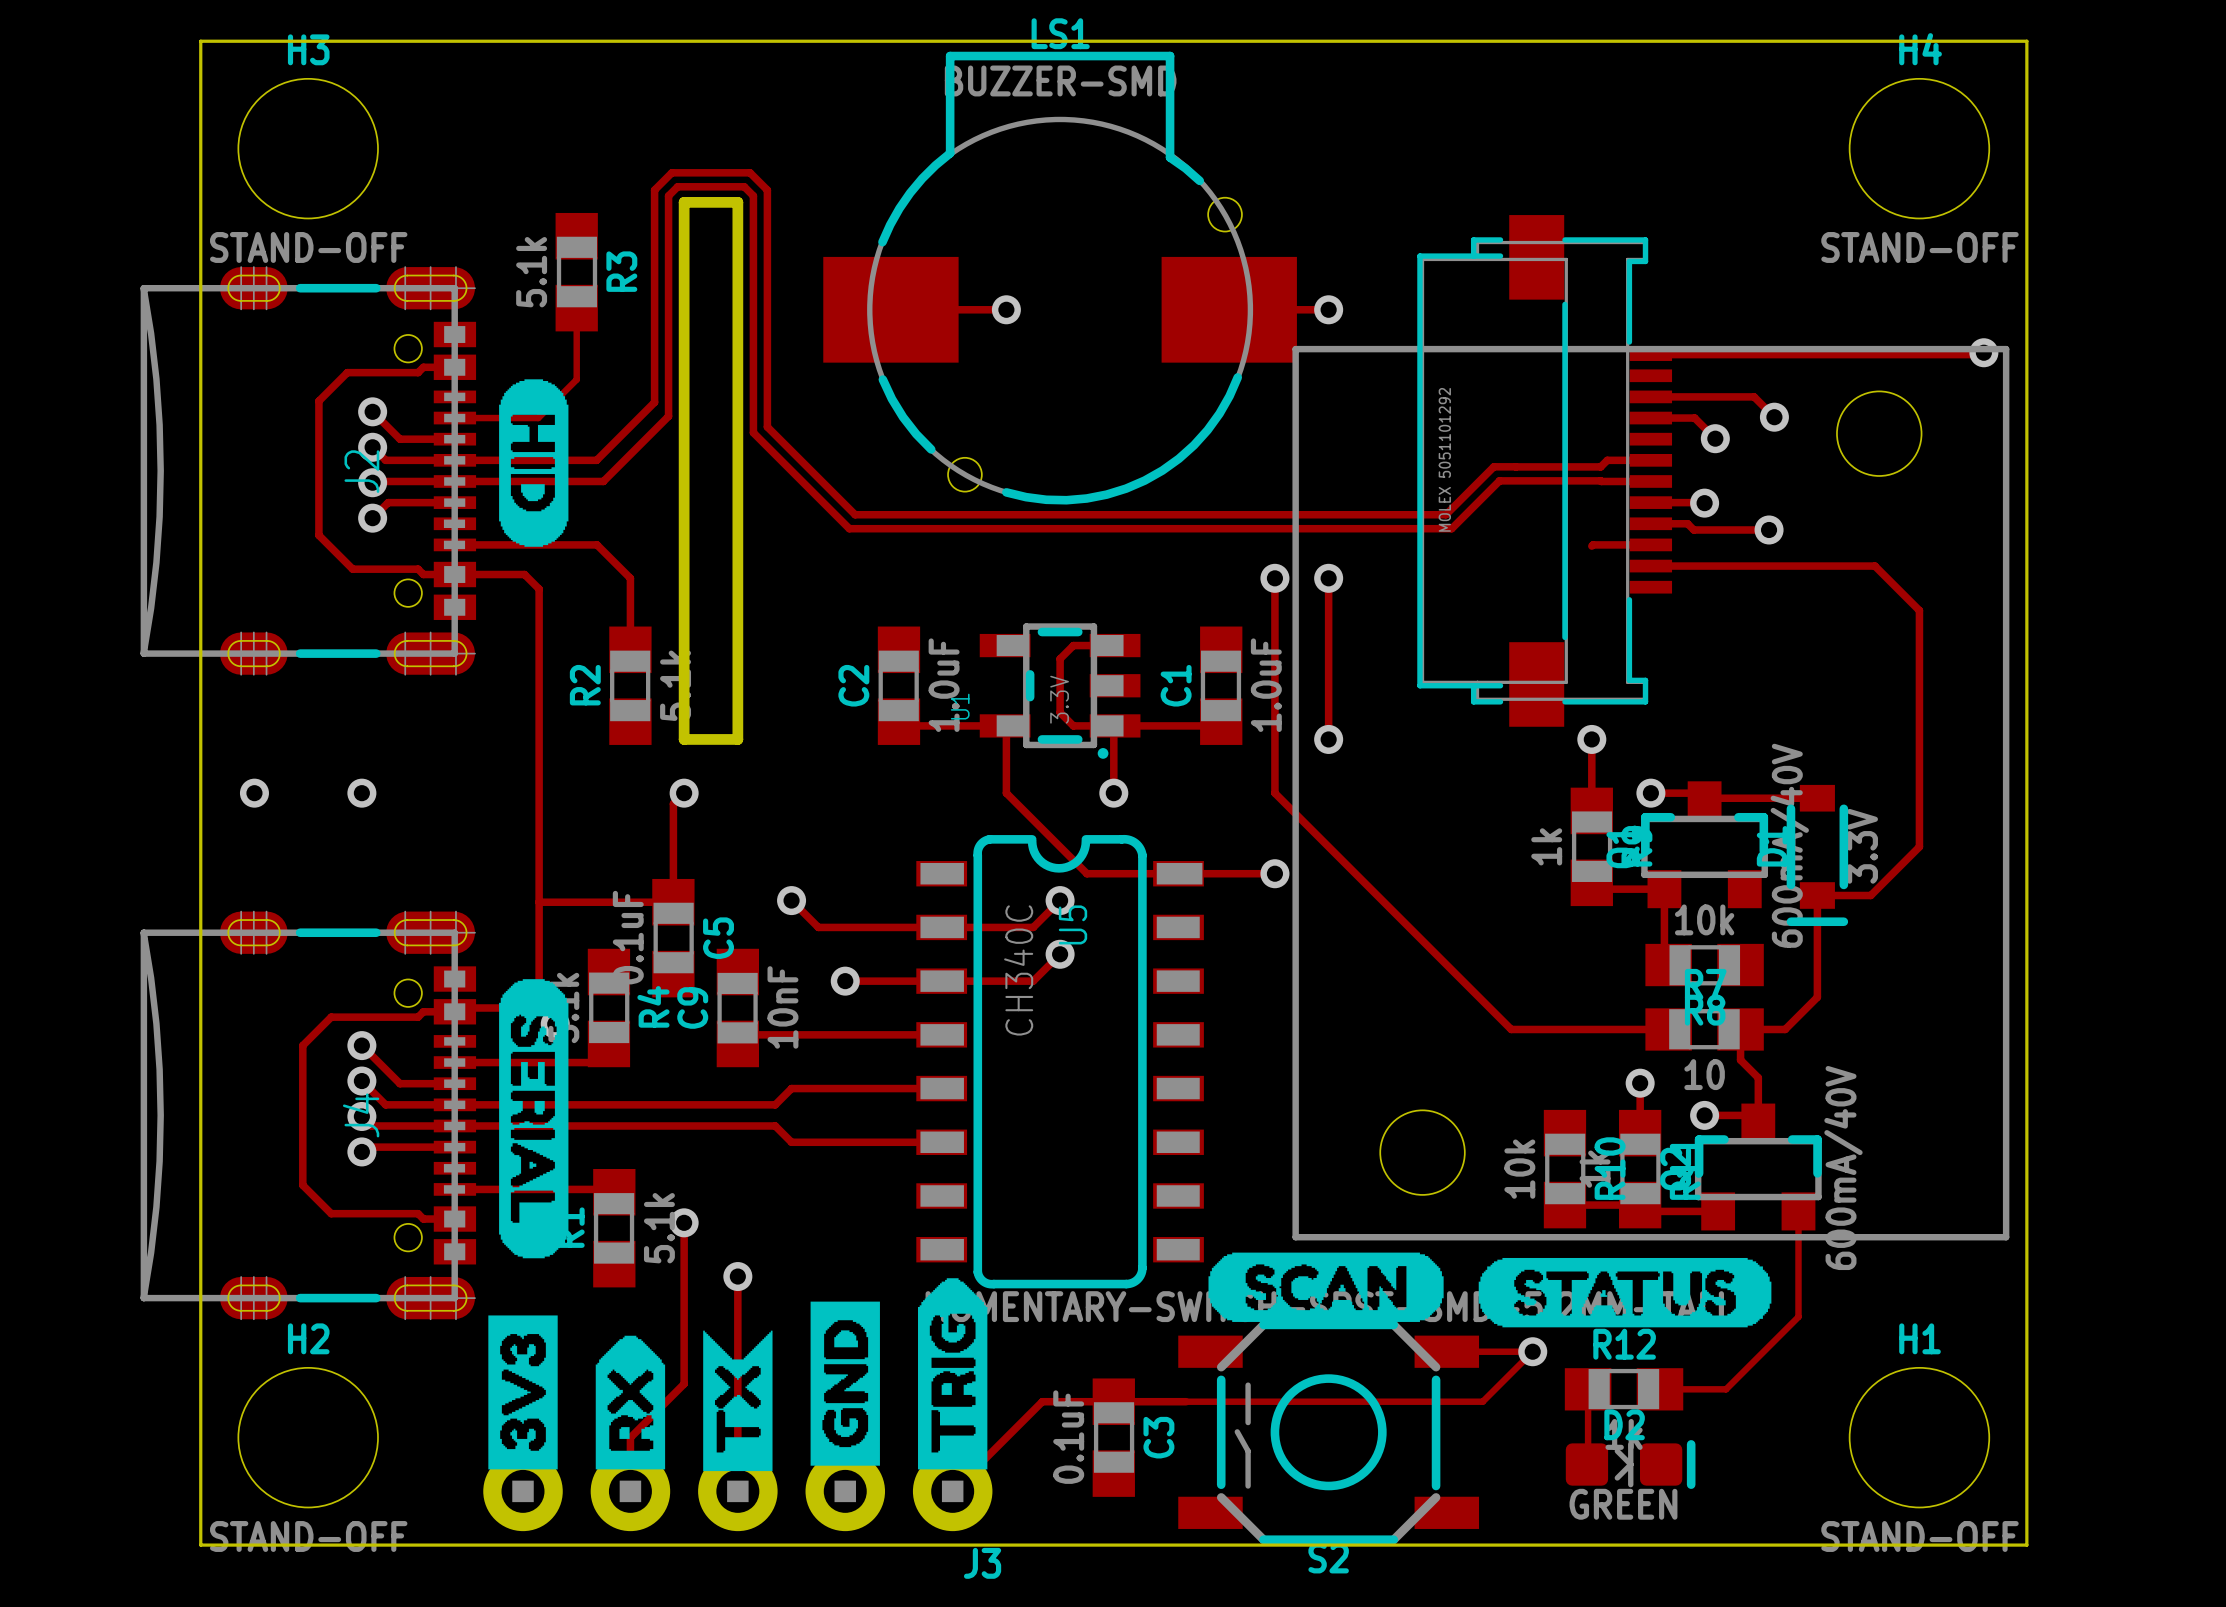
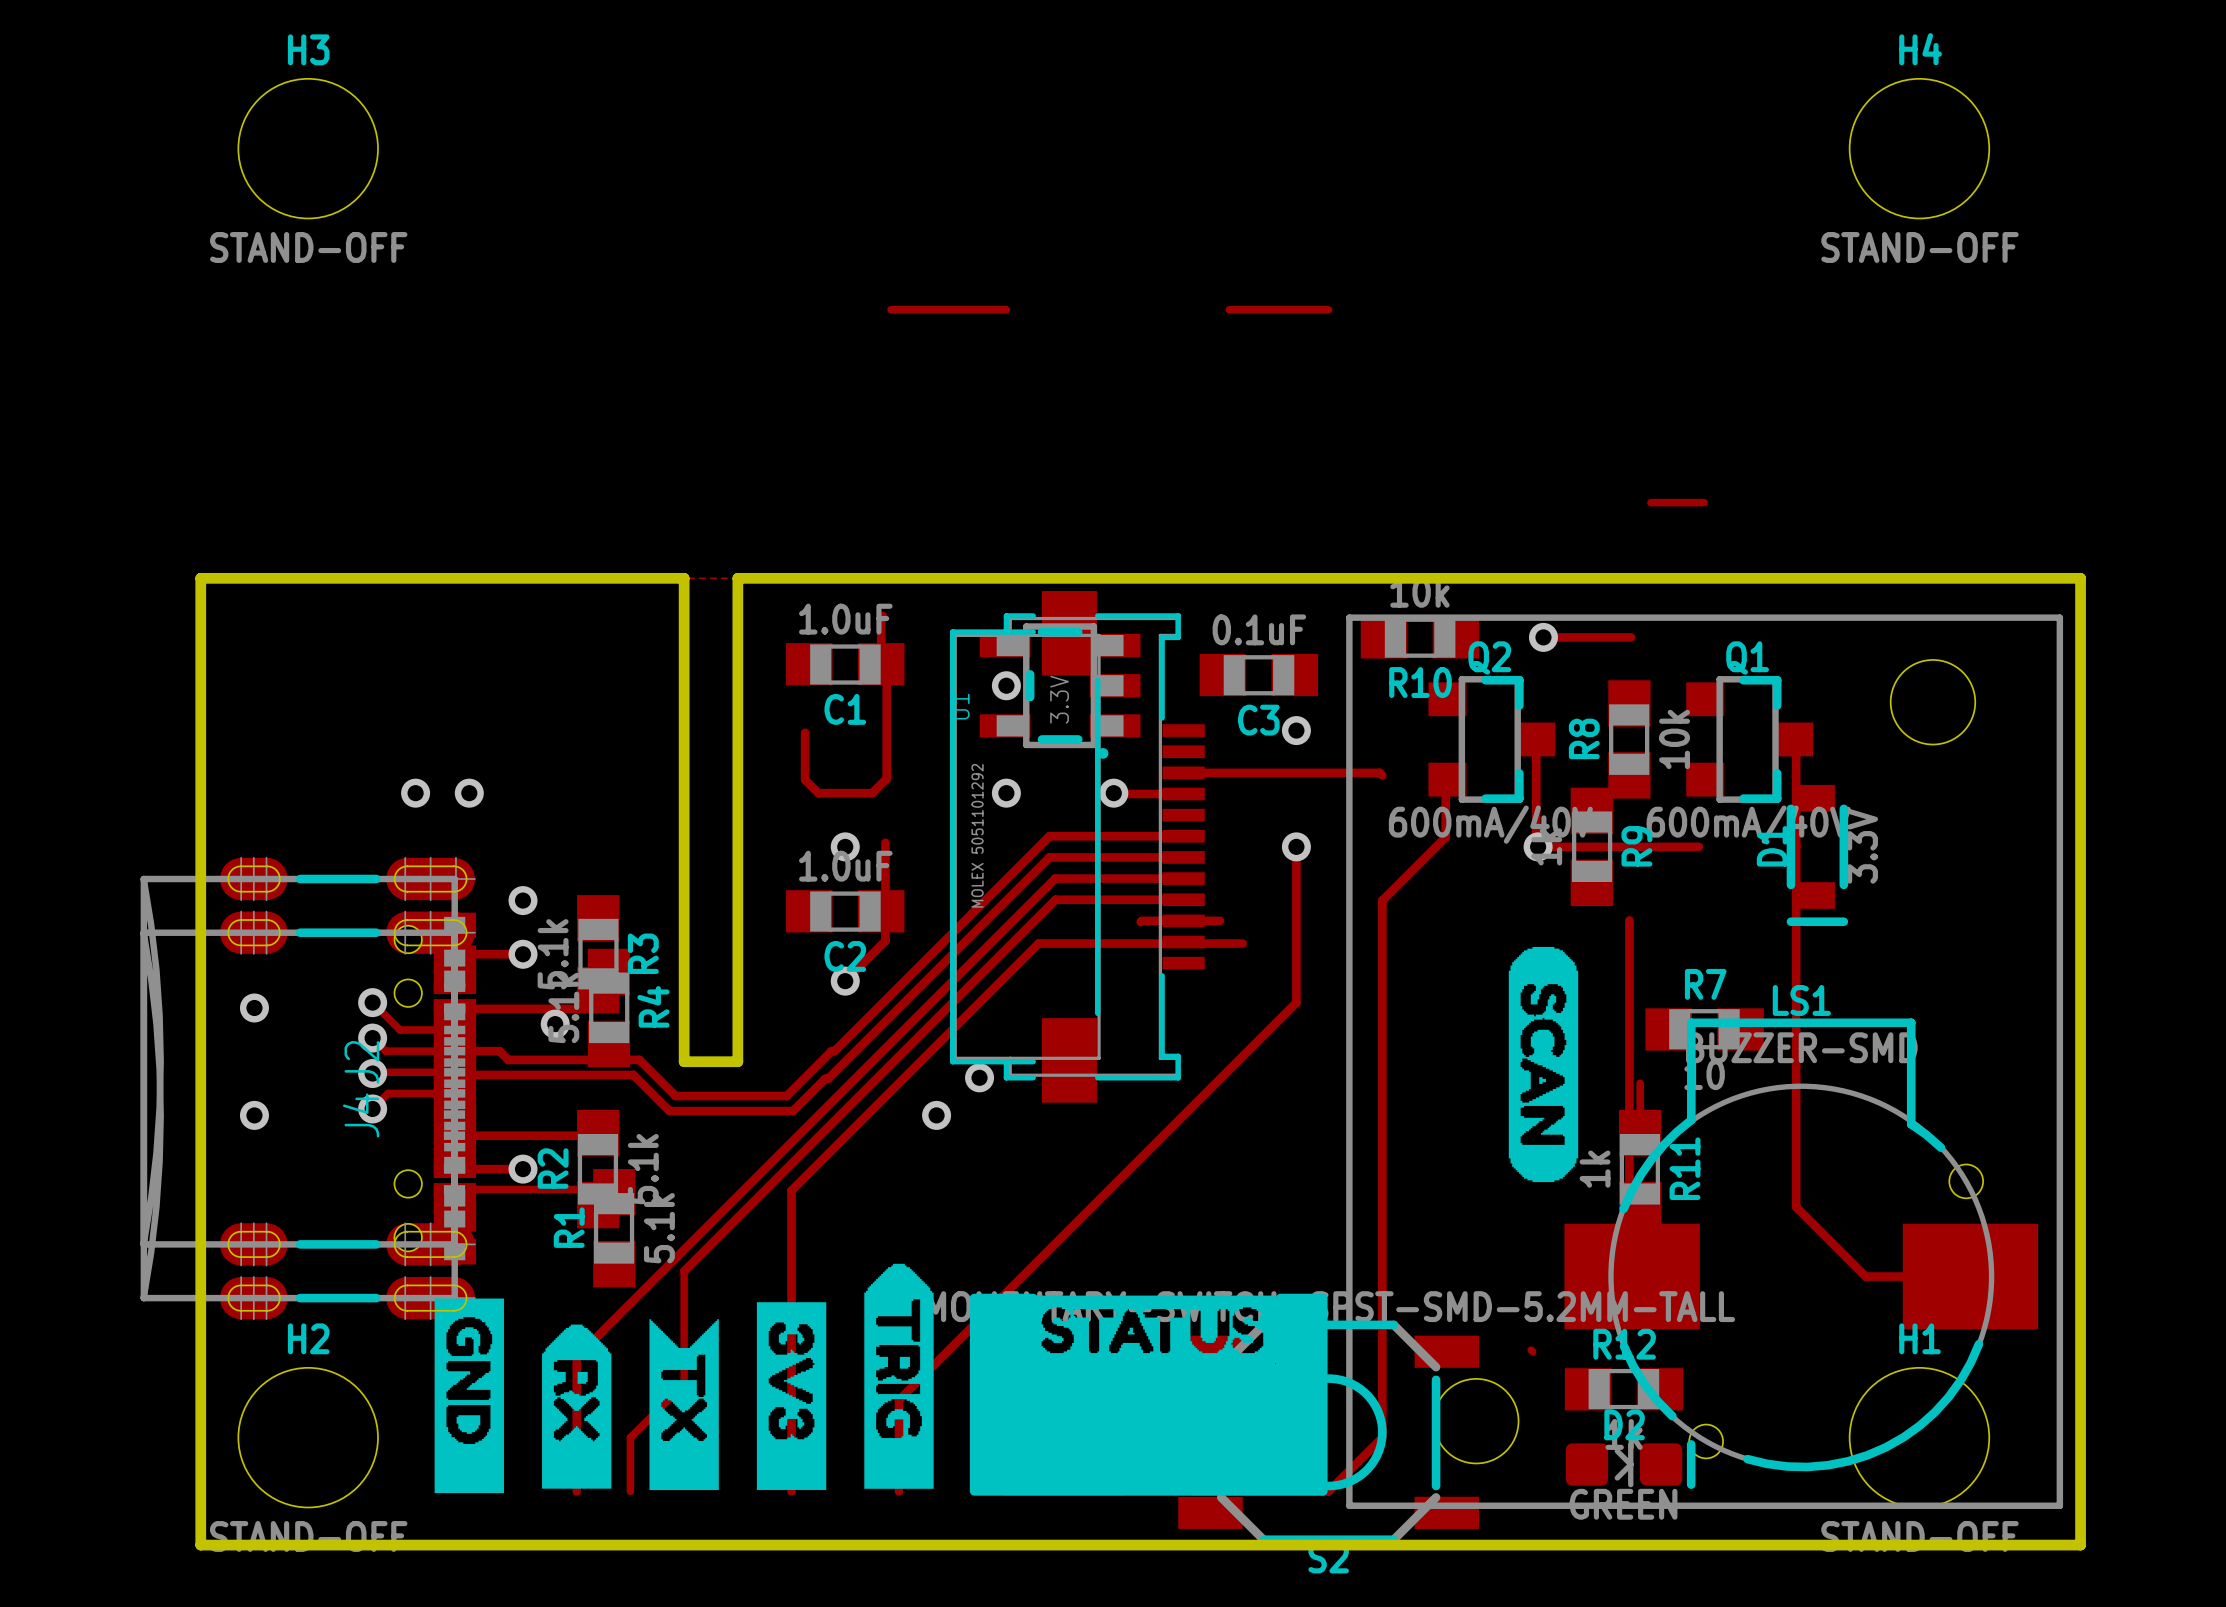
R3 position: (576, 272) -> (598, 954)
LS1 position: (1060, 278) -> (1801, 1244)
track: (576, 308) (576, 379) (538, 418) (454, 418) (466, 418) -> none
via: (1006, 309) -> none
via: (1328, 309) -> none
track: (1983, 352) (1982, 354) (1650, 354) -> none
via: (1983, 352) -> none
track: (454, 367) (423, 367) (418, 372) (347, 372) (318, 401) (318, 535) (352, 569) (418, 569) (423, 574) (524, 574) (539, 589) (539, 991) (523, 1007) (458, 1007) (454, 1011) (423, 1011) (418, 1017) (331, 1017) (302, 1045) (302, 1185) (331, 1213) (418, 1213) (423, 1219) (454, 1219) -> none
drawing: [499, 379, 569, 547] -> none
track: (1650, 396) (1754, 396) (1774, 417) -> none
track: (372, 411) (399, 439) (454, 439) -> (372, 1002) (399, 1029) (454, 1029)
via: (372, 411) -> none
via: (1774, 417) -> none
track: (1650, 418) (1694, 418) (1715, 438) -> none
via: (1715, 438) -> none
track: (372, 447) (385, 460) (596, 460) (654, 402) (654, 190) (671, 172) (750, 172) (767, 190) (767, 426) (855, 514) (1445, 514) (1493, 466) (1515, 466) -> none
via: (372, 447) -> none
track: (1650, 460) (1607, 460) (1600, 466) (1515, 466) -> none
J2 position: (308, 470) -> (308, 1061)
part position: (1544, 470) -> (1077, 846)
track: (1499, 480) (1451, 528) (849, 528) (753, 432) (753, 195) (744, 186) (677, 186) (668, 195) (668, 416) (603, 481) (372, 482) -> none
track: (1499, 480) (1650, 481) -> none
via: (372, 482) -> none
track: (454, 502) (388, 502) (372, 518) -> (454, 1093) (388, 1093) (372, 1108)
via: (1704, 503) -> none
via: (372, 518) -> none
track: (1650, 523) (1687, 523) (1693, 529) (1769, 529) -> none
via: (1769, 529) -> none
track: (454, 544) (597, 544) (630, 578) (630, 649) -> none
track: (1650, 544) (1591, 546) -> none
track: (1650, 566) (1874, 566) (1919, 610) (1919, 846) (1870, 895) (1817, 895) (1817, 997) (1785, 1029) (1740, 1029) (1740, 1060) (1758, 1077) (1758, 1122) (1751, 1115) (1704, 1115) -> none
board edge: (200, 578) (200, 41) (2026, 41) (2026, 1545) -> (737, 578) (2080, 578) (2080, 1545) (2026, 1545)
board edge width: thin (200, 578) (200, 1545) (2026, 1545) -> thick (200, 578) (200, 1545) (2026, 1545)
board edge: (684, 578) (684, 202) (737, 202) (737, 578) -> (684, 578) (200, 578)
track: (1274, 578) (1274, 793) (1511, 1029) (1668, 1029) -> none
via: (1274, 578) -> none
track: (1328, 578) (1328, 739) -> none
via: (1328, 578) -> none
track: none -> (882, 615) (881, 617) (881, 664) (886, 669) (886, 778) (872, 793) (818, 793) (805, 779) (805, 732)
track: none -> (1543, 637) (1631, 637)
via: none -> (1543, 637)
track: (1115, 645) (1073, 645) (1060, 658) (1060, 712) (1073, 725) (1221, 725) (1221, 721) -> none
R2 position: (630, 685) -> (598, 1169)
C2 rotation: 0° (898, 685) -> 90° clockwise (845, 911)
C2 position: (898, 685) -> (845, 911)
via: none -> (1006, 685)
C1 rotation: 0° (1221, 685) -> 90° clockwise (845, 664)
C1 position: (1221, 685) -> (845, 664)
track: (898, 721) (898, 725) (1005, 725) (1006, 793) (1086, 873) (1274, 873) -> none
track: (1115, 725) (1113, 793) -> (1183, 794) (1113, 793)
board edge: (684, 739) (737, 739) -> (684, 739) (684, 1061) (737, 1061) (737, 739)
via position: (1328, 739) -> (1296, 730)
track: none -> (1536, 739) (1536, 845) (1538, 846) (1627, 846) (1629, 848) (1631, 846) (1698, 846)
track: (1591, 739) (1591, 810) -> none
via: (1591, 739) -> none
track: none -> (1794, 739) (1796, 741) (1796, 1207) (1865, 1276) (1970, 1276)
track: none -> (1183, 772) (1379, 772) (1382, 775)
track: none -> (1447, 779) (1445, 781) (1445, 837) (1382, 900) (1382, 1437) (1328, 1491) (1192, 1491)
via: (254, 793) -> none
via: (361, 793) -> none
via: none -> (415, 793)
via: none -> (469, 793)
track: (684, 793) (673, 803) (673, 902) (539, 902) -> none
via: (684, 793) -> none
via: none -> (1006, 793)
track: (1650, 793) (1697, 793) (1704, 800) (1706, 798) (1817, 798) -> none
part position: (1650, 793) -> (1704, 1061)
via: (1650, 793) -> none
track: none -> (1183, 836) (1049, 836) (834, 1051) (831, 1051) (786, 1096) (675, 1096) (639, 1059) (508, 1059) (499, 1051) (385, 1051) (372, 1038)
Q1 rotation: 0° (1704, 844) -> 90° clockwise (1749, 739)
Q1 position: (1704, 844) -> (1749, 739)
track: none -> (1296, 846) (1296, 1002) (898, 1400) (898, 1491)
via: none -> (1538, 846)
track: none -> (1183, 857) (1049, 857) (828, 1078) (825, 1078) (792, 1111) (669, 1111) (633, 1074) (457, 1074) (454, 1072) (372, 1073)
via position: (1274, 873) -> (1296, 846)
track: none -> (1183, 878) (1055, 878) (576, 1357) (576, 1491)
track: (1591, 882) (1598, 889) (1664, 889) (1664, 960) (1668, 965) -> none
via: none -> (523, 900)
track: (791, 900) (818, 927) (1033, 927) (1060, 900) -> none
via position: (791, 900) -> (845, 846)
via: (1060, 900) -> none
track: none -> (1220, 920) (1140, 922)
track: none -> (1629, 920) (1629, 1273) (1632, 1276)
C5: 0.1uF (673, 938) -> none
track: none -> (1242, 943) (1038, 943) (791, 1190) (791, 1491)
drawing: none -> [1508, 946, 1579, 1183]
track: none -> (523, 954) (458, 954) (454, 958)
via: none -> (523, 954)
track: (1060, 954) (1033, 981) (845, 981) -> (885, 842) (885, 940) (845, 981)
via: (1060, 954) -> none
R8 rotation: 0° (1704, 965) -> 90° clockwise (1629, 739)
R8 position: (1704, 965) -> (1629, 739)
drawing: [499, 979, 569, 1259] -> none
track: none -> (598, 990) (579, 1008) (454, 1008)
via: none -> (372, 1002)
via: none -> (254, 1007)
C9: 10nF (737, 1007) -> none
track: (941, 1034) (746, 1034) (737, 1043) -> none
track: (608, 1043) (590, 1062) (454, 1062) -> none
track: (361, 1045) (399, 1083) (454, 1083) -> none
via position: (361, 1045) -> (372, 1038)
U5: CH340C (1060, 1061) -> none
via: none -> (979, 1077)
track: (361, 1081) (385, 1104) (775, 1104) (791, 1088) (941, 1088) -> none
via position: (361, 1081) -> (372, 1073)
via: (1640, 1083) -> none
via: none -> (254, 1115)
via: none -> (936, 1115)
via: (1704, 1115) -> none
track: (361, 1116) (371, 1125) (775, 1125) (791, 1142) (941, 1142) -> none
via position: (361, 1116) -> (372, 1108)
track: none -> (598, 1133) (595, 1135) (454, 1135)
track: (454, 1147) (366, 1147) (361, 1151) -> none
via: (361, 1151) -> none
track: none -> (454, 1165) (458, 1169) (523, 1169)
Q2 rotation: 0° (1758, 1167) -> 90° clockwise (1491, 739)
Q2 position: (1758, 1167) -> (1491, 739)
via: none -> (523, 1169)
R10 rotation: 0° (1564, 1169) -> 90° clockwise (1419, 637)
R10 position: (1564, 1169) -> (1419, 637)
track: (1564, 1205) (1640, 1205) (1646, 1211) (1718, 1211) -> none
track: (1798, 1211) (1798, 1316) (1726, 1389) (1659, 1389) (1664, 1385) -> none
track: (684, 1222) (684, 1271) -> (1183, 899) (1055, 899) (684, 1271)
via: (684, 1222) -> none
drawing: [1208, 1252, 1444, 1322] -> none
drawing: none -> [434, 1263, 1328, 1496]
track: (737, 1276) (737, 1491) -> none
via: (737, 1276) -> none
drawing: [488, 1278, 988, 1472] -> none
drawing position: (1625, 1292) -> (1152, 1330)
track: (1446, 1351) (1532, 1351) (1482, 1401) (1042, 1401) (952, 1491) -> none
via: (1532, 1351) -> none
track: (1588, 1389) (1586, 1464) -> none
C3 rotation: 0° (1113, 1437) -> 90° clockwise (1258, 675)
C3 position: (1113, 1437) -> (1258, 675)
J3: (737, 1491) -> none

